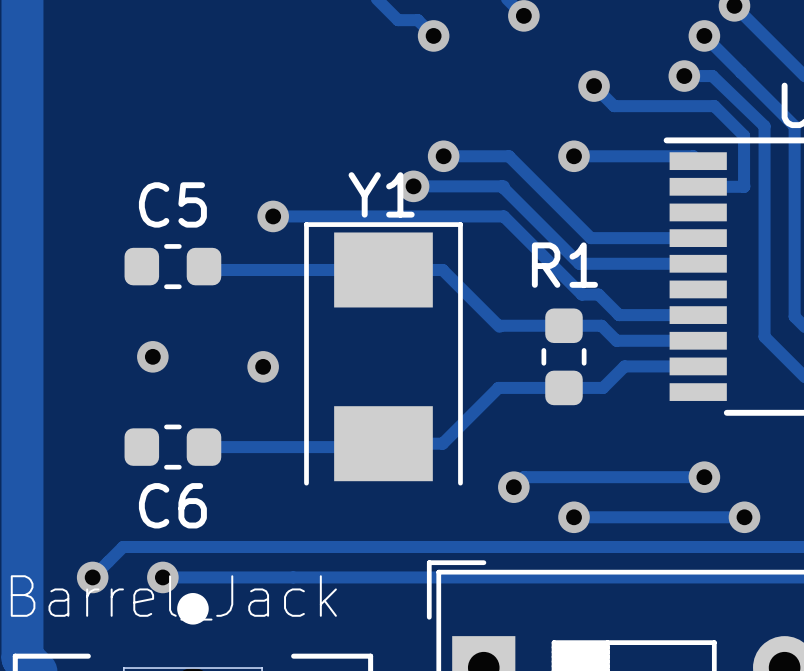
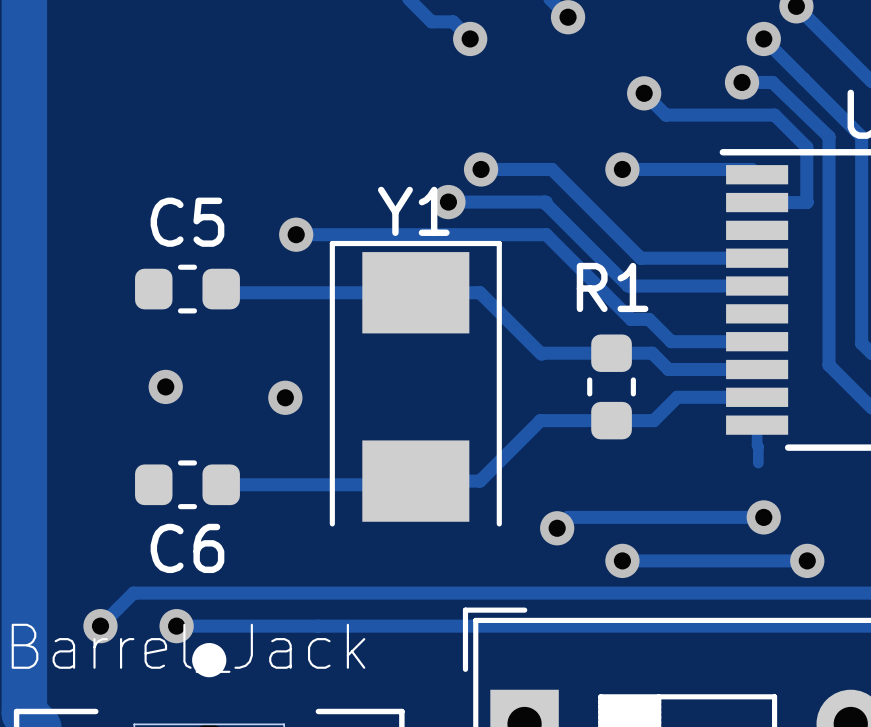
track: none -> (757, 425) (758, 463)

